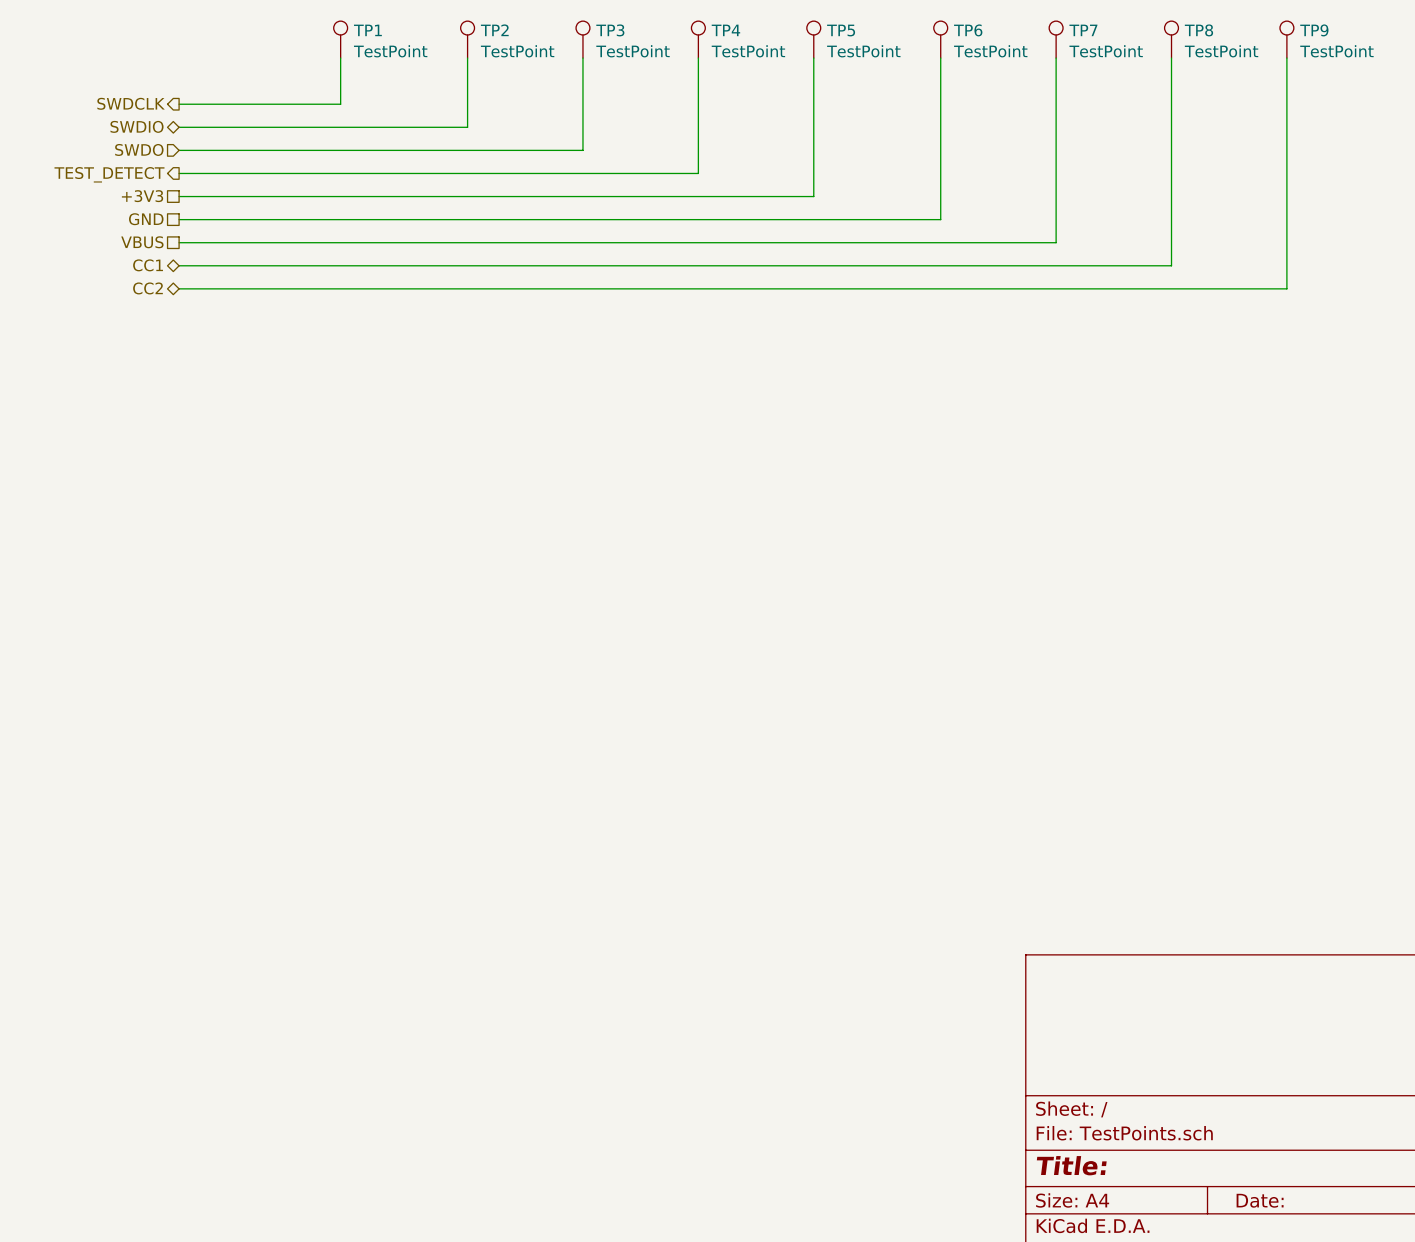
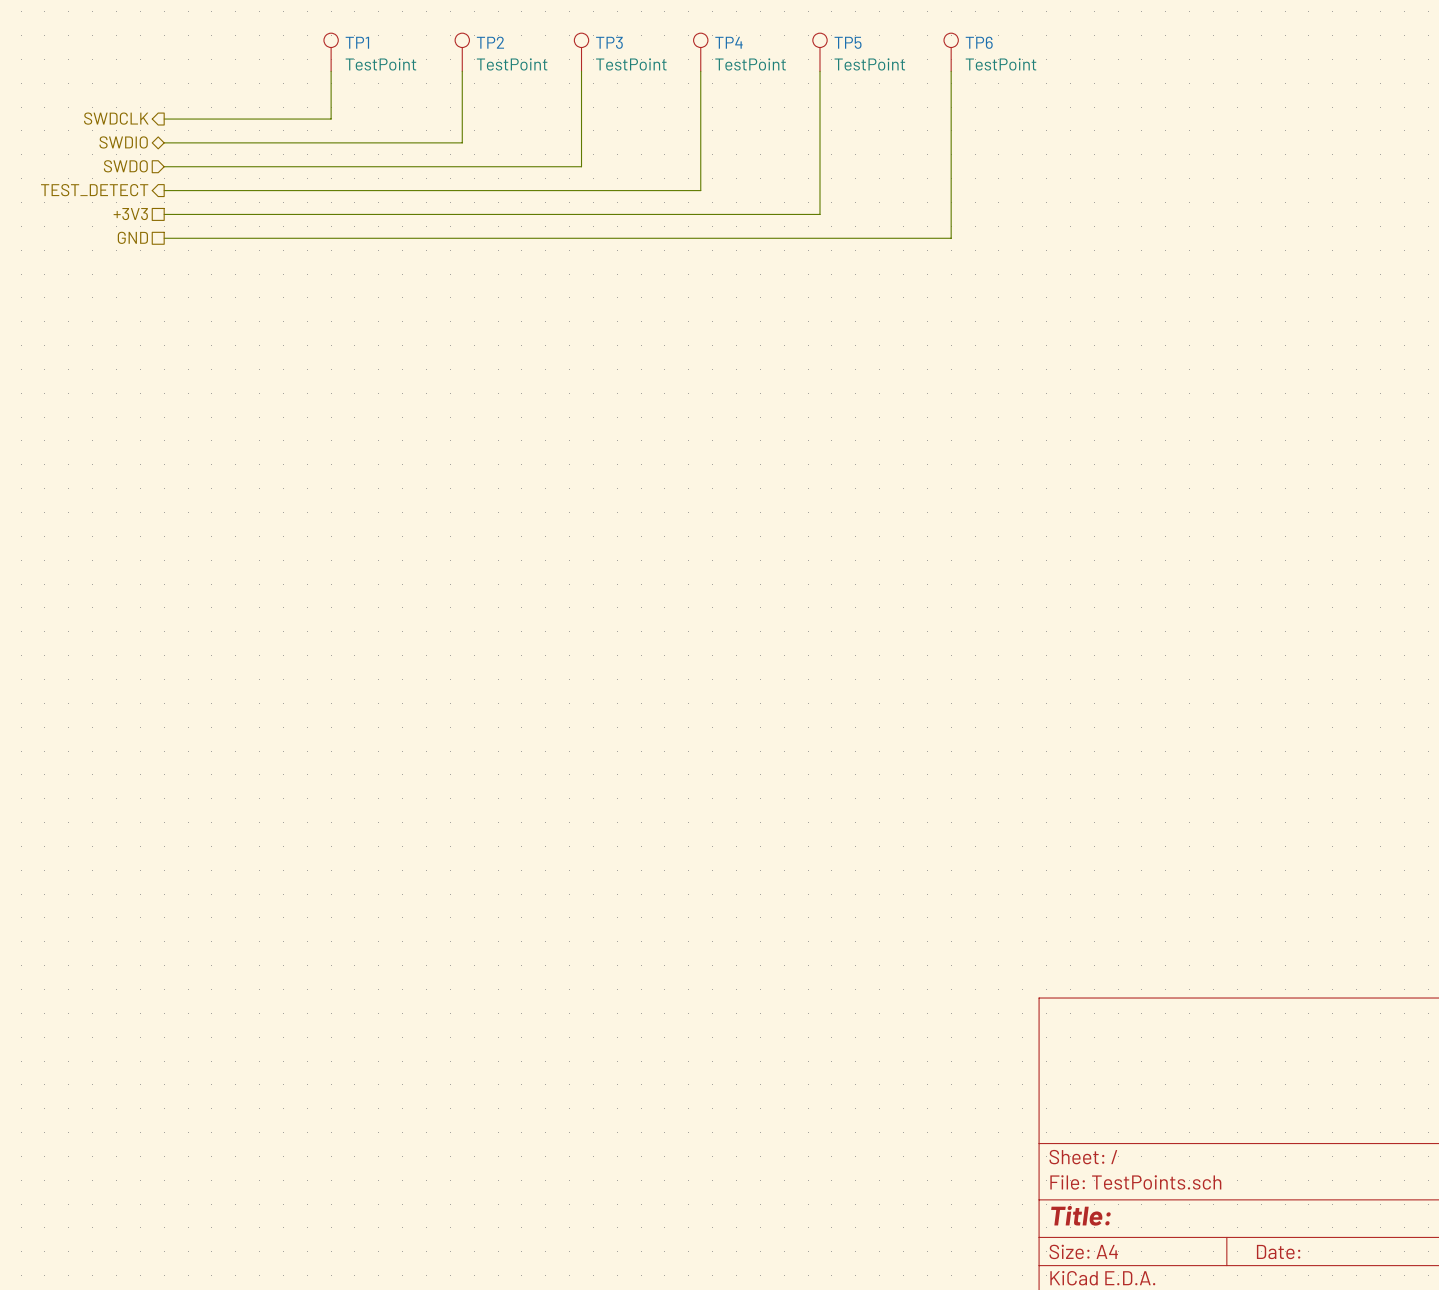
TP7: TestPoint (1056, 39) -> none
TP8: TestPoint (1171, 39) -> none
TP9: TestPoint (1286, 39) -> none
wire: (1056, 58) (1056, 242) (179, 242) -> none
wire: (1171, 58) (1171, 265) (179, 265) -> none
wire: (1286, 58) (1286, 288) (179, 288) -> none
hierarchical label: VBUS (142, 242) -> none
hierarchical label: CC1 (148, 265) -> none
hierarchical label: CC2 (147, 288) -> none

